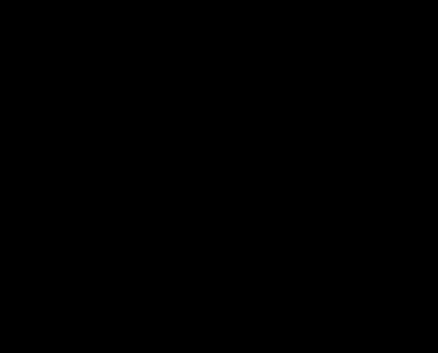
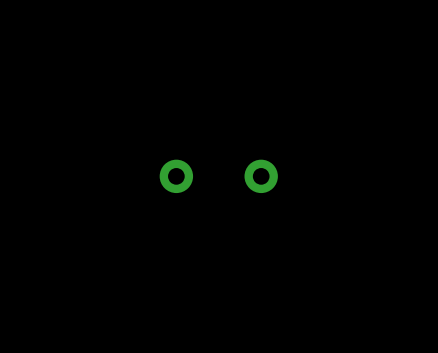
part: none -> (218, 176)

